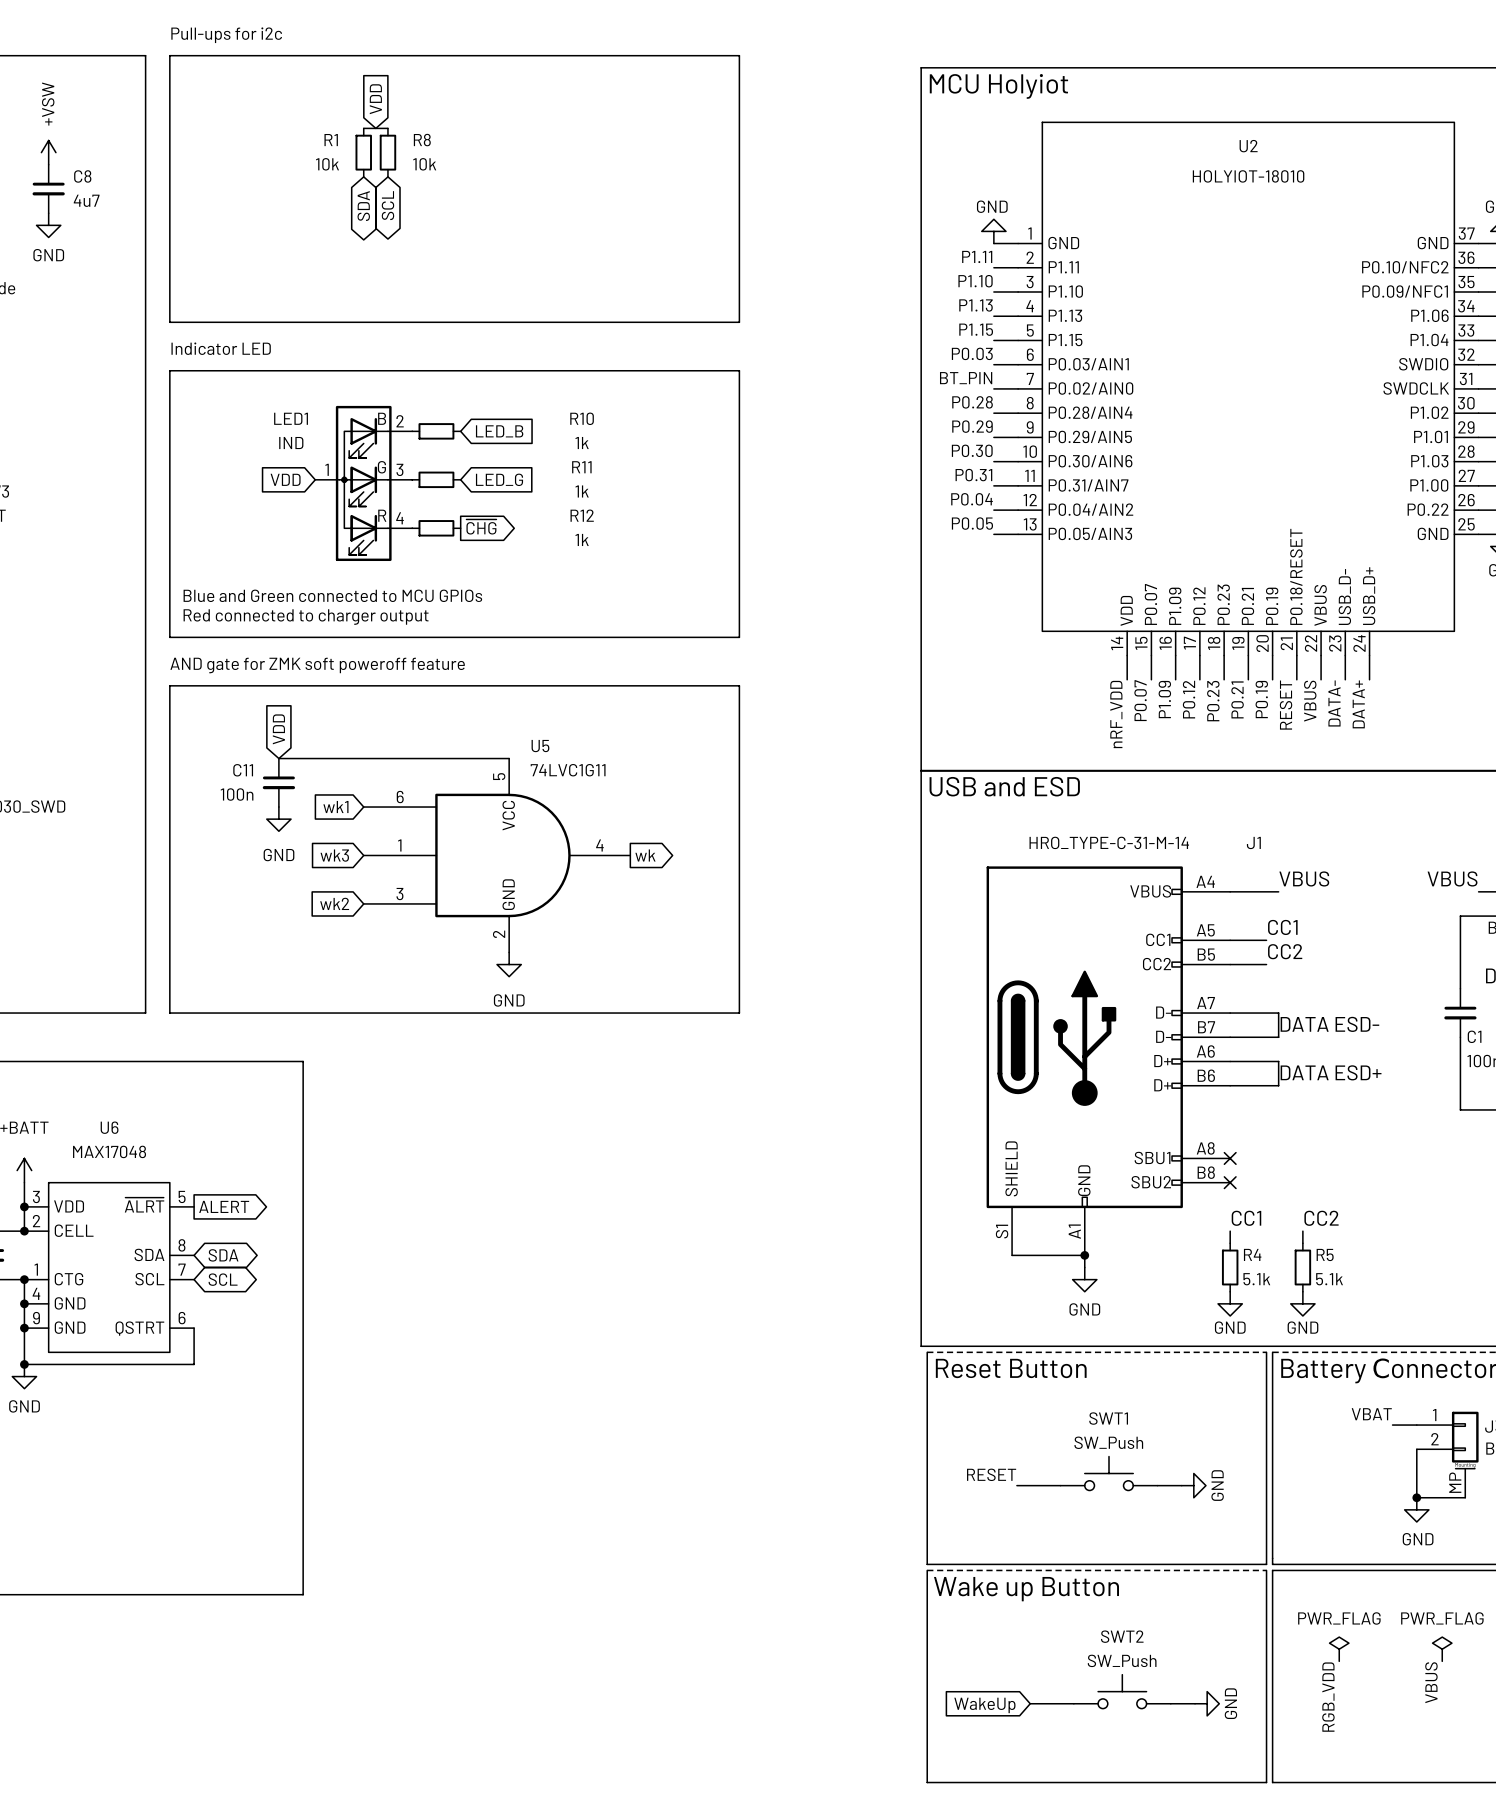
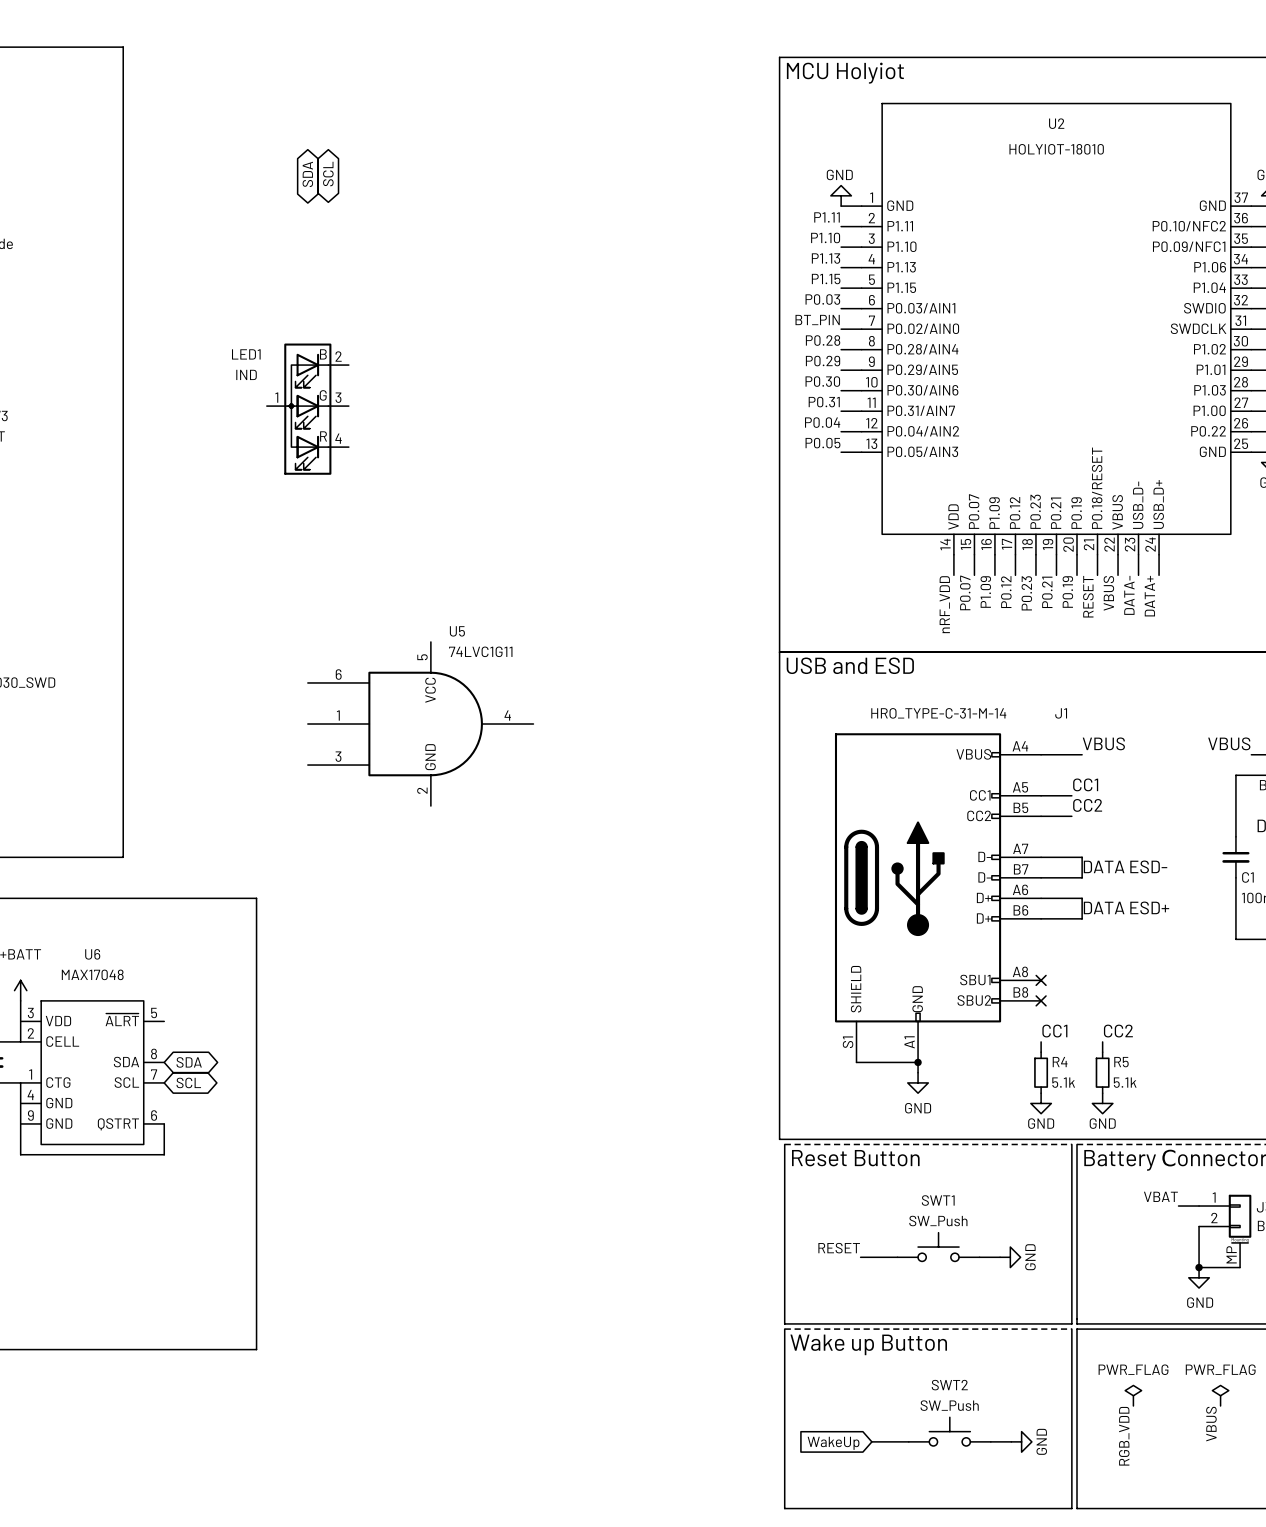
text: Pull-ups for i2c (226, 35) -> none
line: (169, 55) (169, 322) (739, 322) (739, 55) (169, 55) -> none
global label: VDD (375, 99) -> none
wire: (363, 128) (387, 128) -> none
power symbol: +VSW (48, 152) -> none
R1: 10k (363, 152) -> none
R8: 10k (387, 152) -> none
C8: 4u7 (48, 188) -> none
power symbol: GND (48, 225) -> none
text: Indicator LED (221, 348) -> none
line: (169, 370) (169, 637) (739, 637) (739, 370) (169, 370) -> none
R10: 1k (436, 431) -> none
global label: LED_B (499, 431) -> none
global label: VDD (285, 479) -> none
R11: 1k (436, 479) -> none
global label: LED_G (499, 479) -> none
global label: ~{CHG} (481, 526) -> none
R12: 1k (436, 528) -> none
text: Blue and Green connected to MCU GPIOs (332, 595) -> none
text: Red connected to charger output (306, 617) -> none
text: AND gate for ZMK soft poweroff feature (317, 665) -> none
line: (169, 685) (739, 685) (739, 1013) (169, 1013) (169, 685) -> none
global label: VDD (278, 729) -> none
wire: (278, 758) (509, 758) -> none
C11: 100n (278, 782) -> none
global label: wk1 (335, 807) -> none
power symbol: GND (278, 819) -> none
global label: wk3 (334, 855) -> none
global label: wk (645, 855) -> none
global label: wk2 (334, 903) -> none
power symbol: GND (509, 964) -> none
junction: (24, 1206) -> none
global label: ALERT (224, 1206) -> none
junction: (24, 1231) -> none
junction: (24, 1279) -> none
junction: (24, 1303) -> none
junction: (24, 1328) -> none
junction: (24, 1364) -> none
power symbol: GND (24, 1376) -> none

